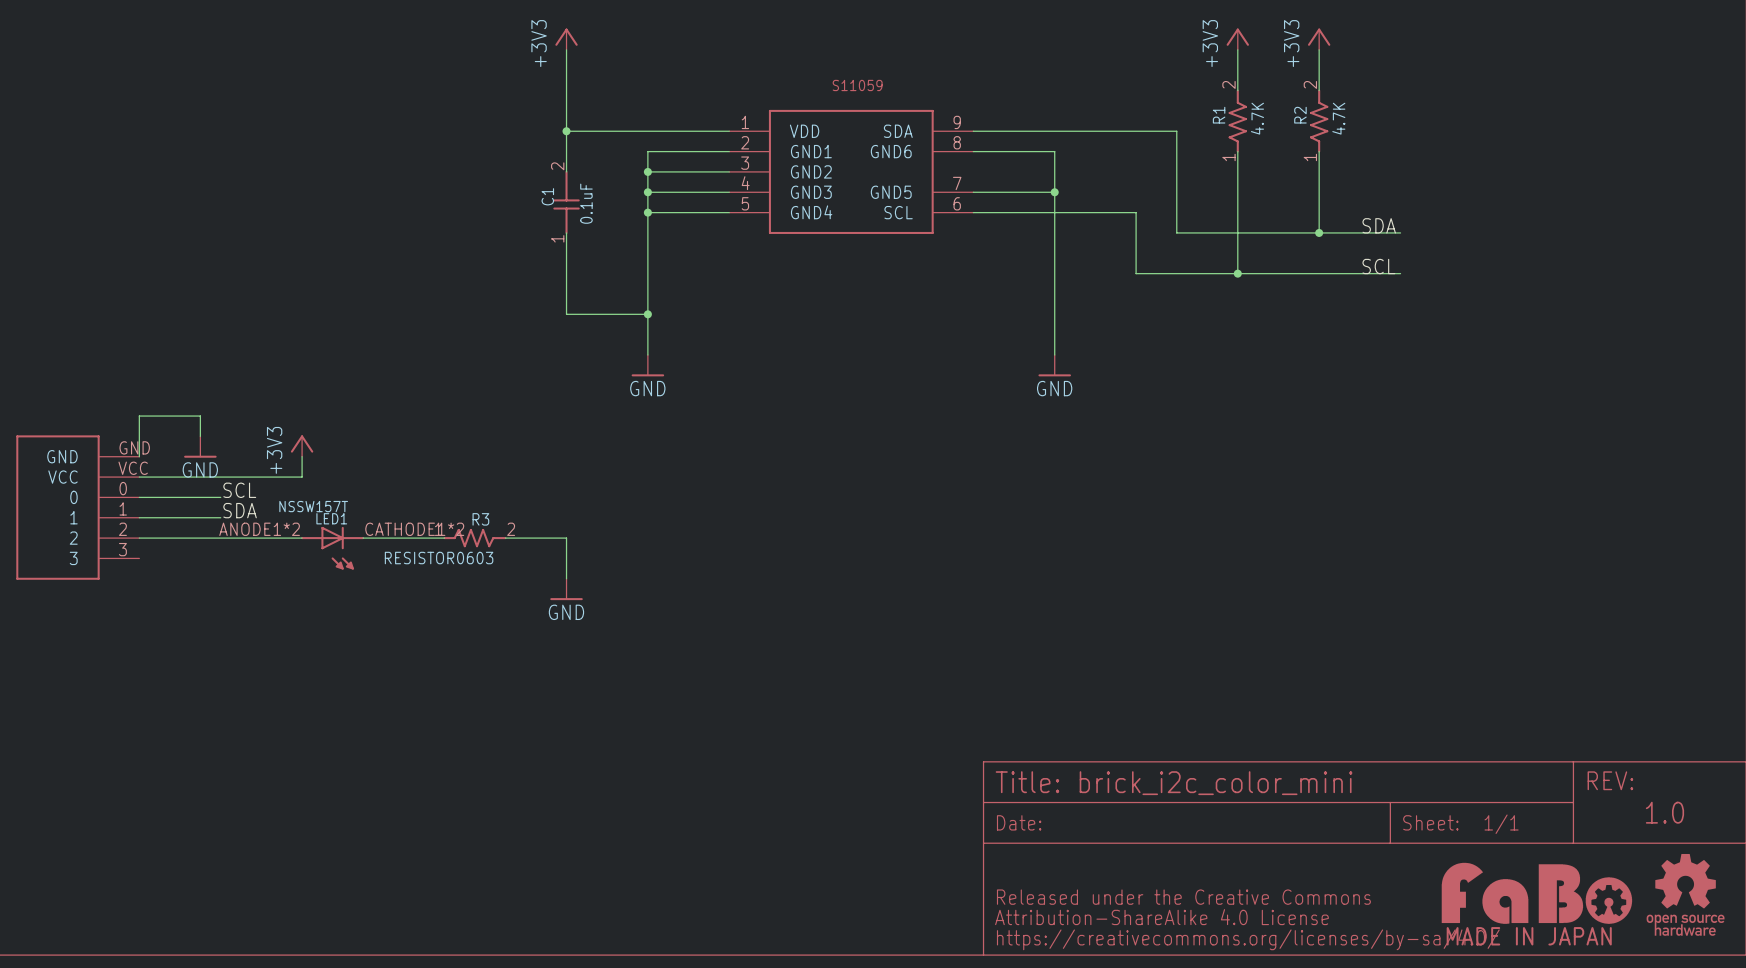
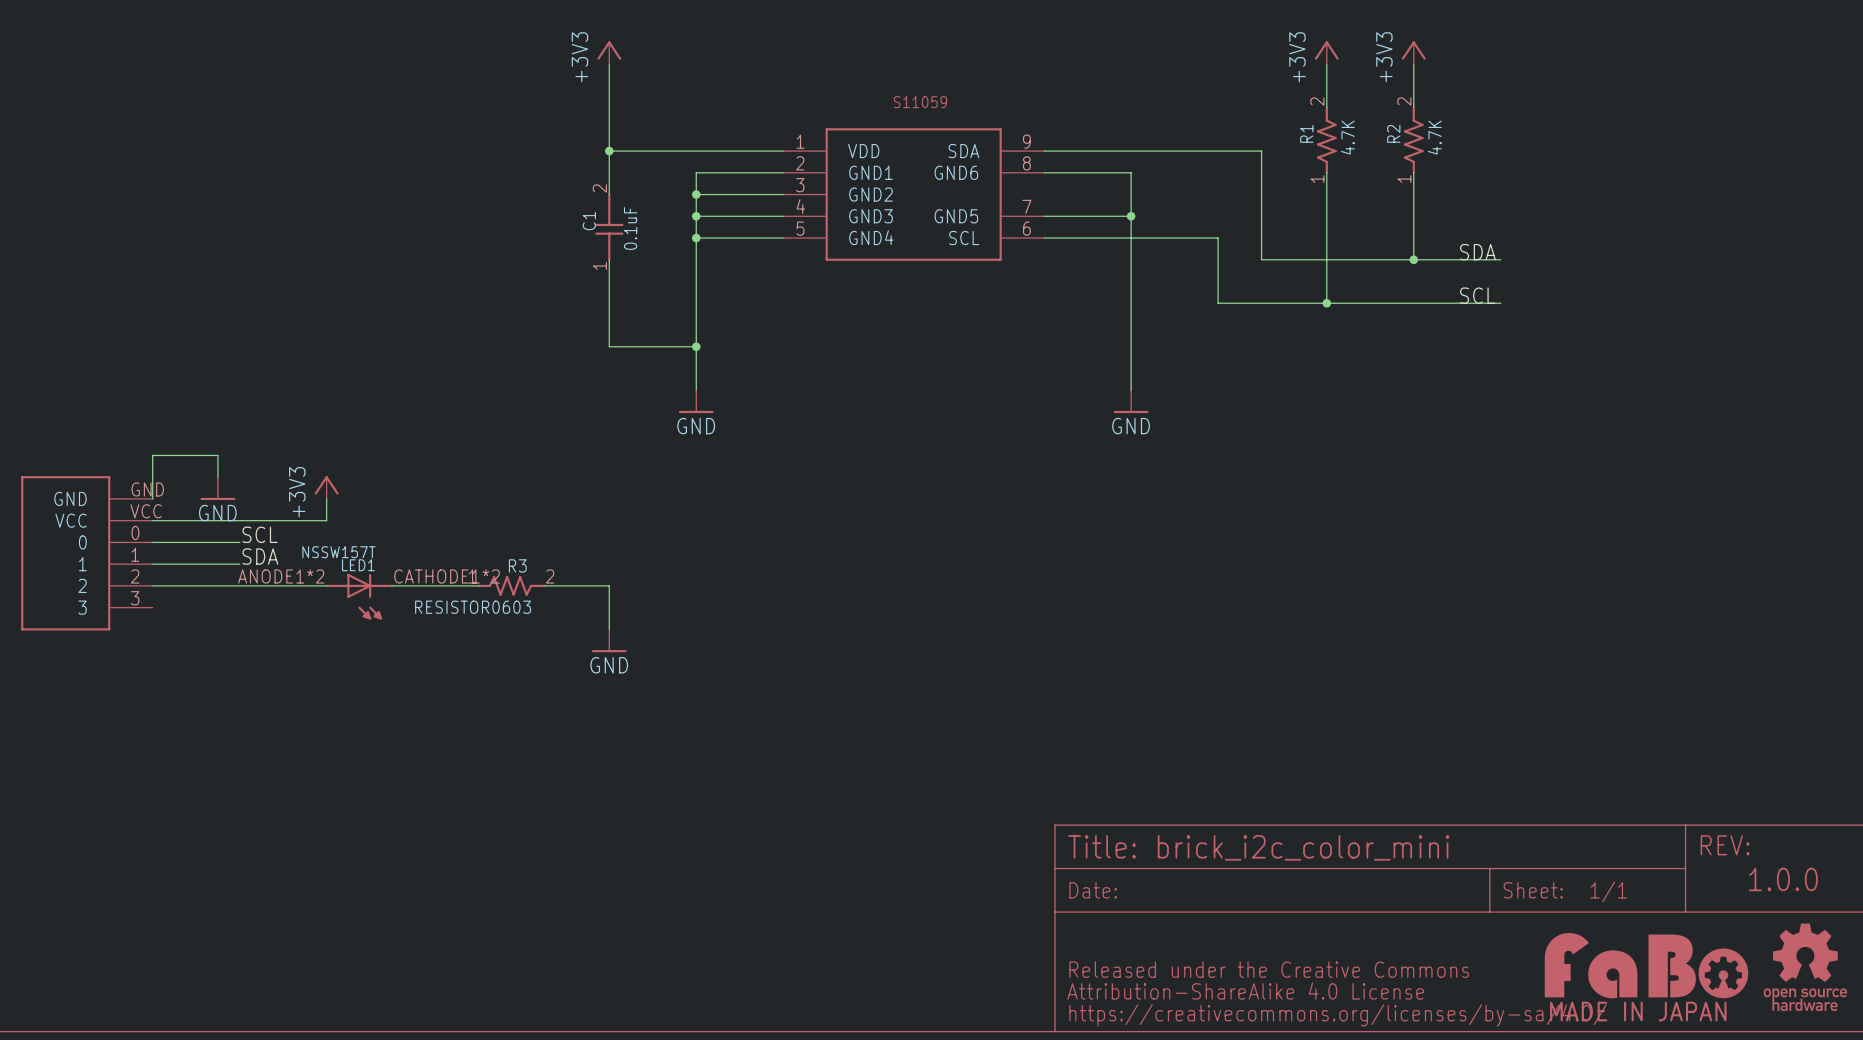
text: 1.0 (1664, 812) -> 1.0.0 (1783, 879)

